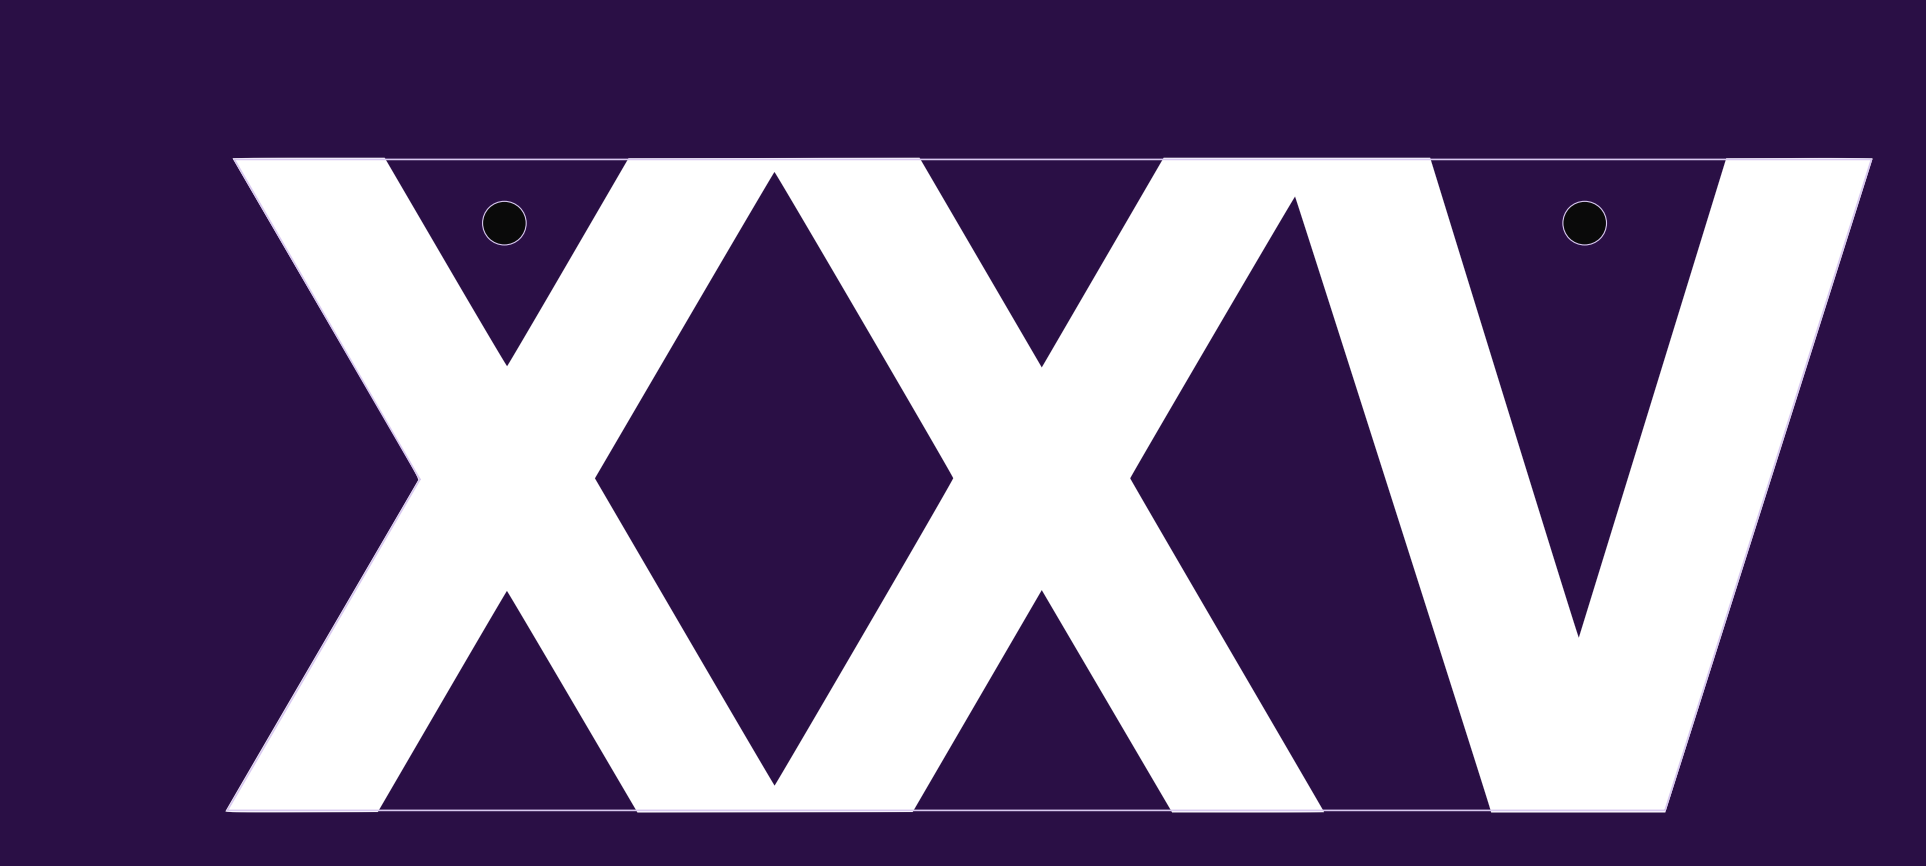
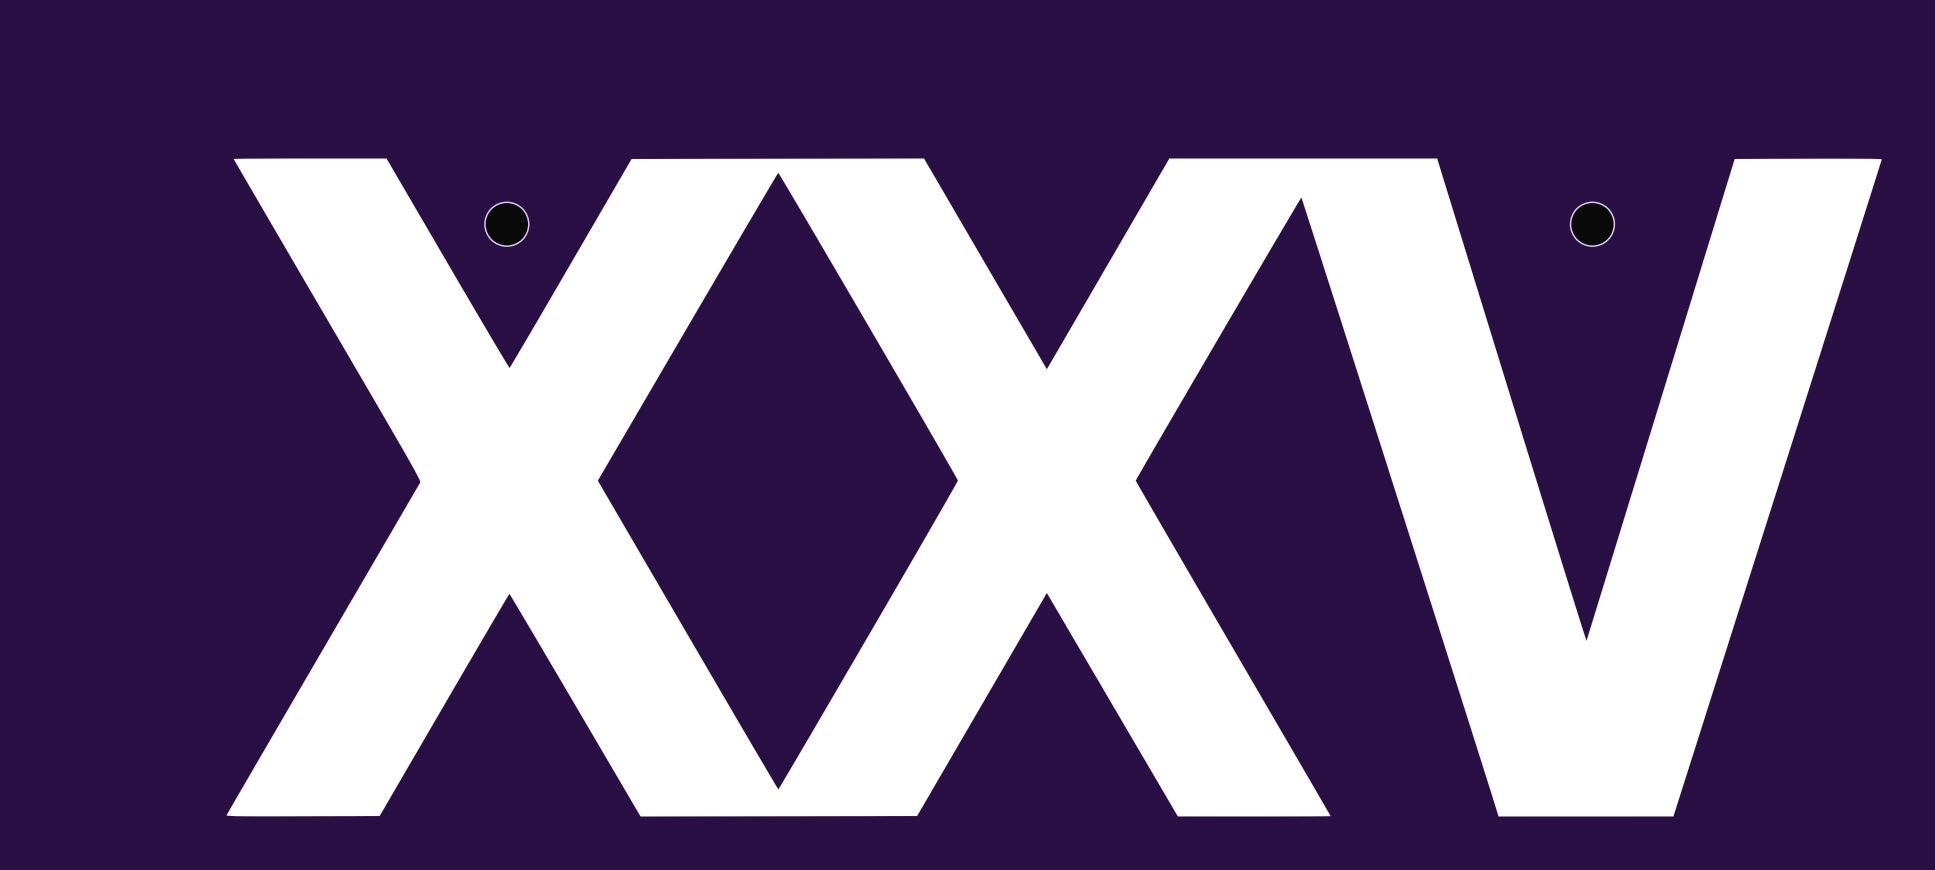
board edge: (234, 159) (1871, 159) (1665, 810) (227, 810) (419, 479) (234, 159) -> none

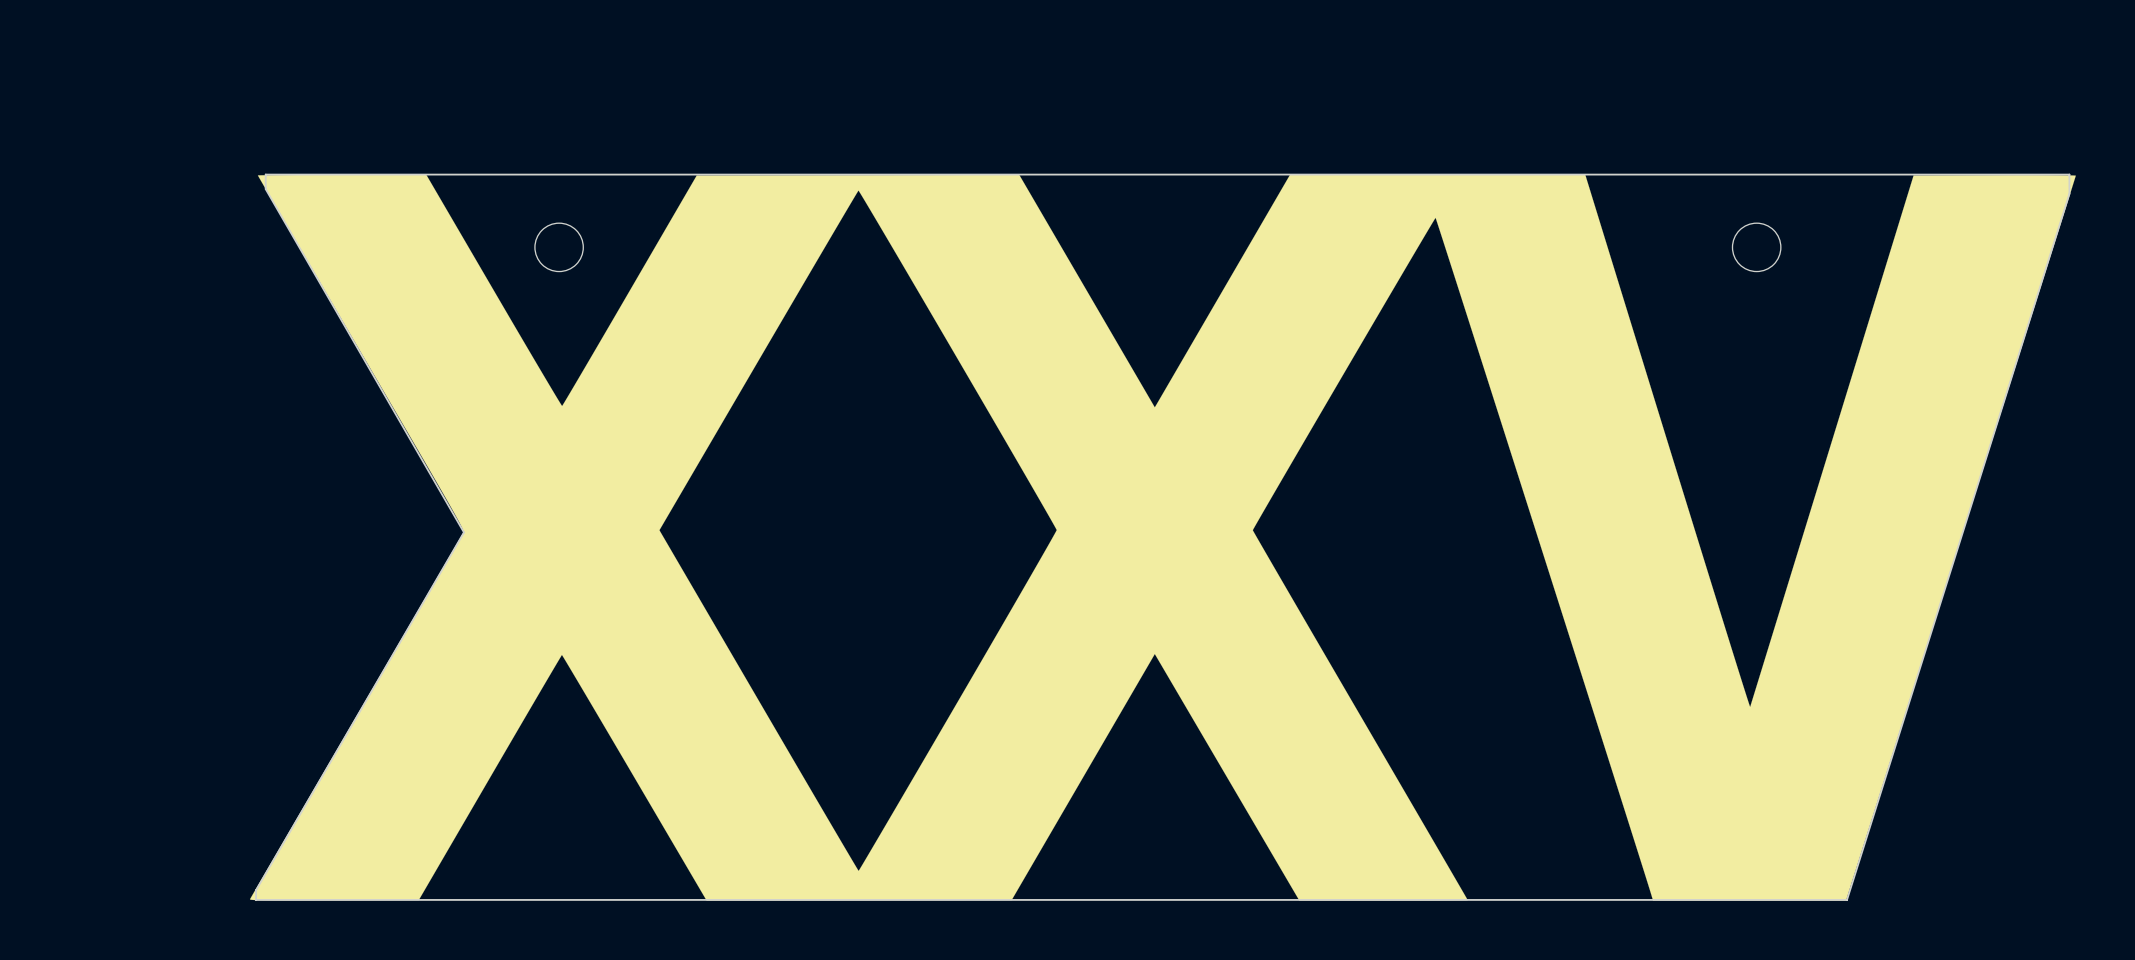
board edge: none -> (265, 174) (265, 189) (463, 532) (256, 890) (256, 899) (1846, 899) (2069, 193) (2069, 174) (265, 174)

